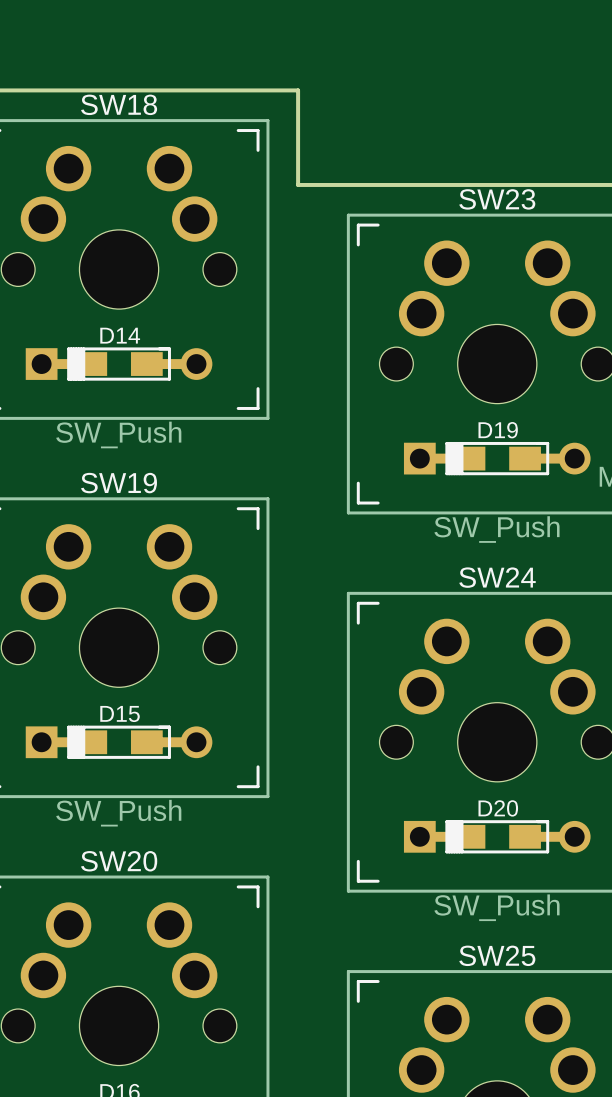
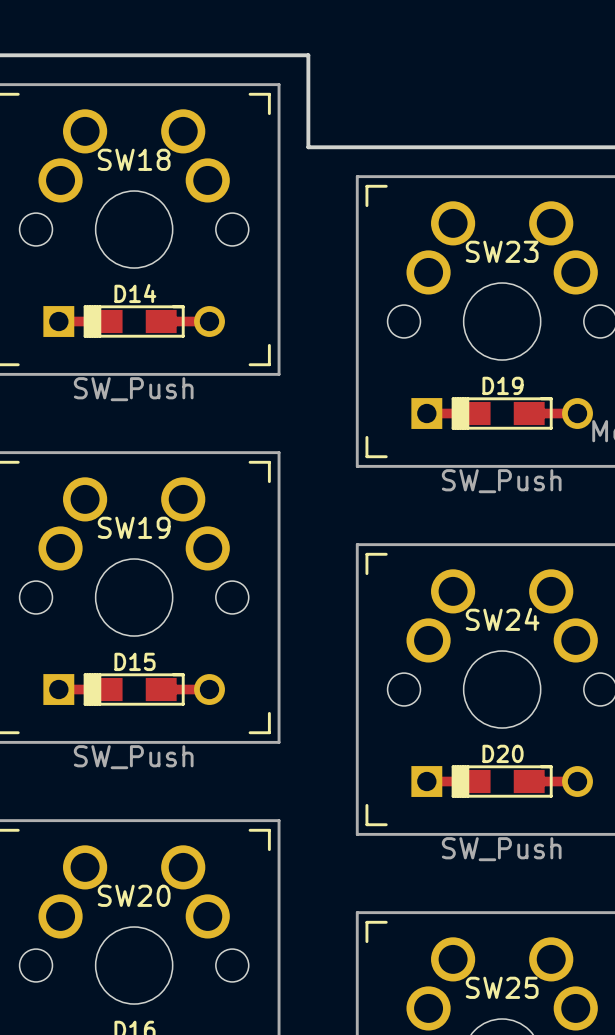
SW18 name position: SW18 (119, 104) -> SW18 (134, 159)
SW23 name position: SW23 (497, 199) -> SW23 (502, 251)
SW19 name position: SW19 (119, 483) -> SW19 (134, 527)
SW24 name position: SW24 (497, 577) -> SW24 (502, 619)
SW20 name position: SW20 (119, 861) -> SW20 (134, 895)
SW25 name position: SW25 (497, 955) -> SW25 (502, 987)

